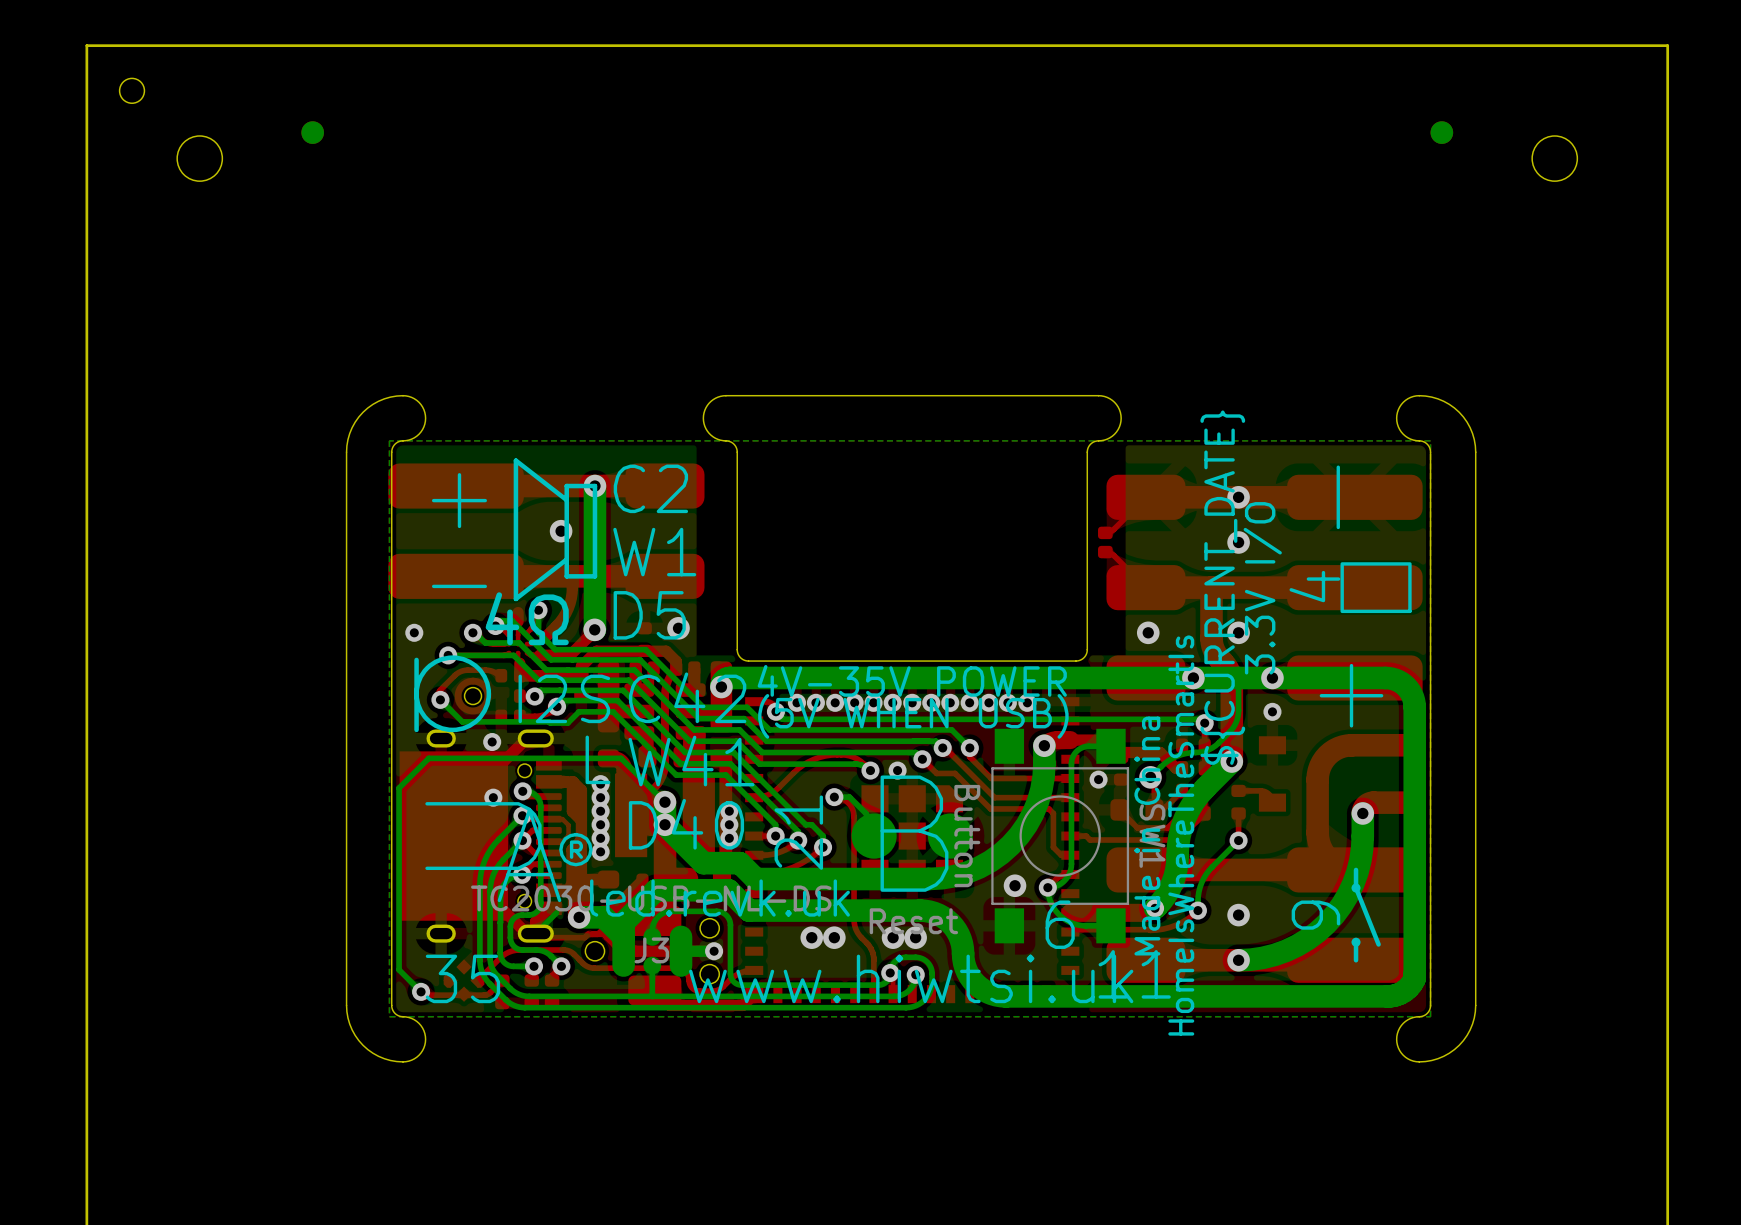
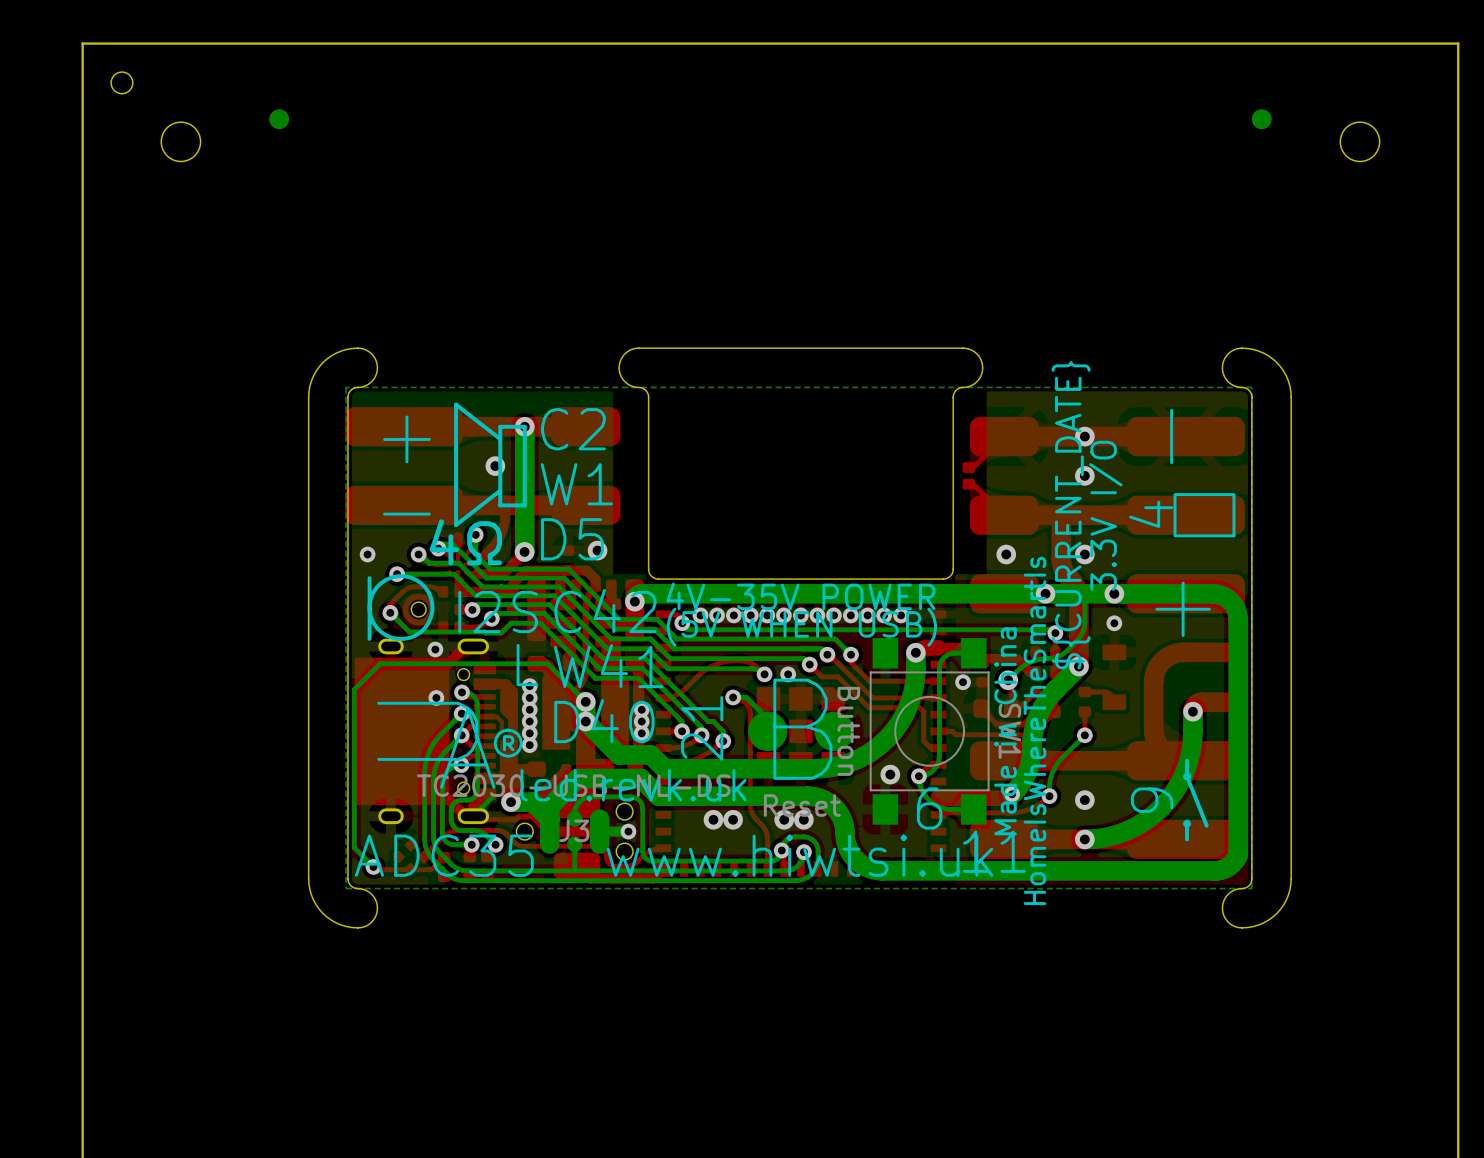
text: 35 (462, 978) -> none
text: none -> ADC35 (444, 855)

